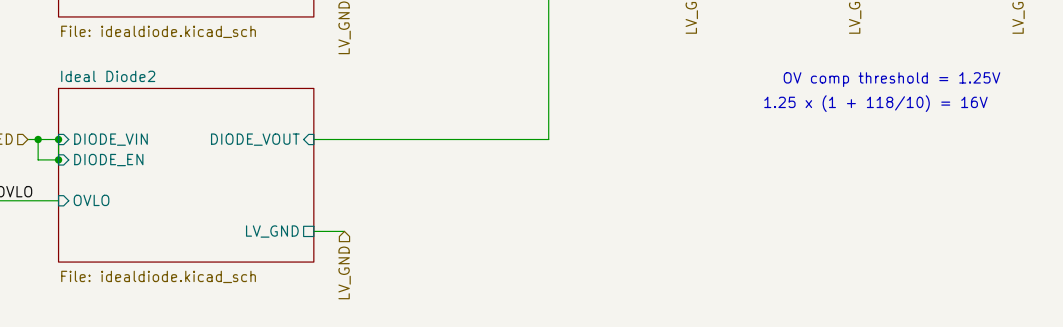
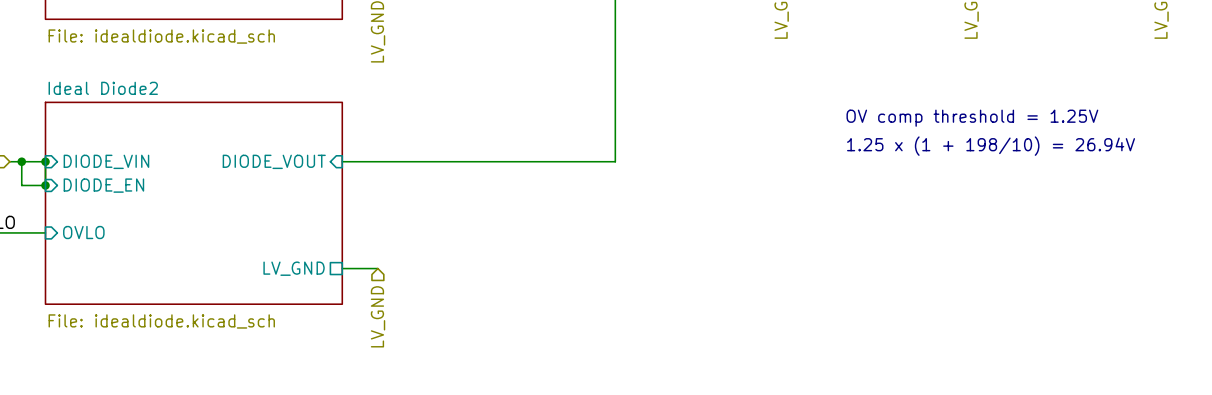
text position: OV comp threshold = 1.25V (891, 79) -> OV comp threshold = 1.25V (972, 118)
text: 1.25 x (1 + 118/10) = 16V (875, 103) -> none
text: none -> 1.25 x (1 + 198/10) = 26.94V (991, 146)

